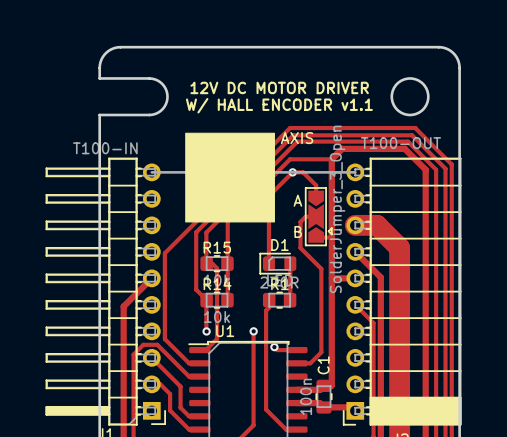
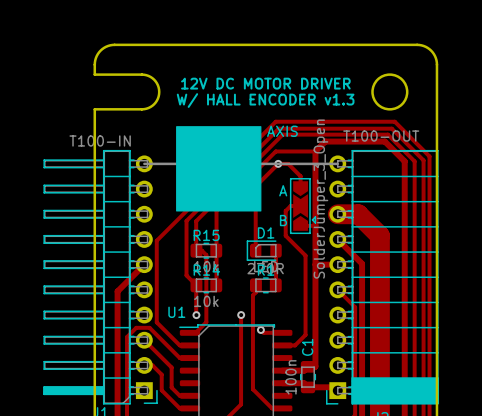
text: W/ HALL ENCODER v1.1 (279, 105) -> W/ HALL ENCODER v1.3 (265, 100)
U1 name position: U1 (225, 331) -> U1 (176, 312)

